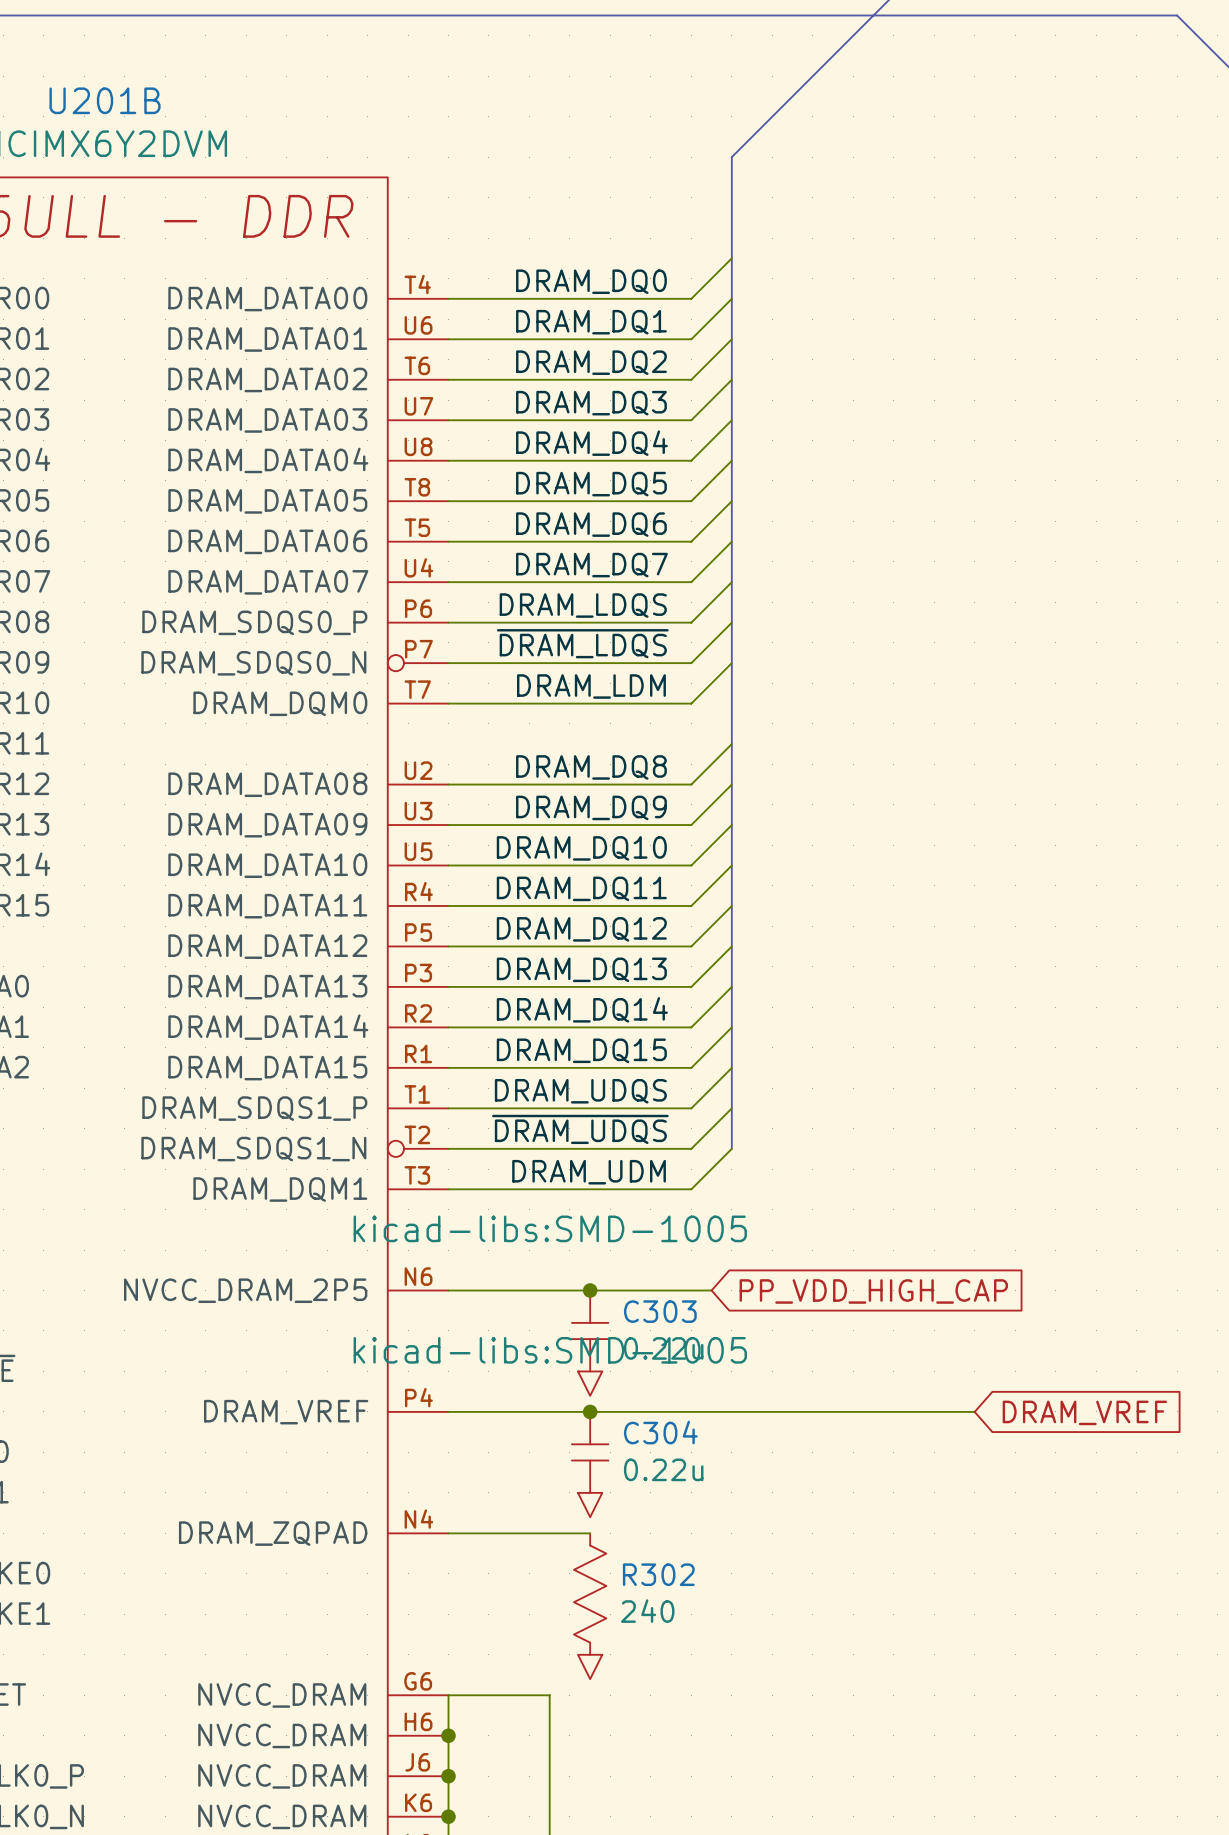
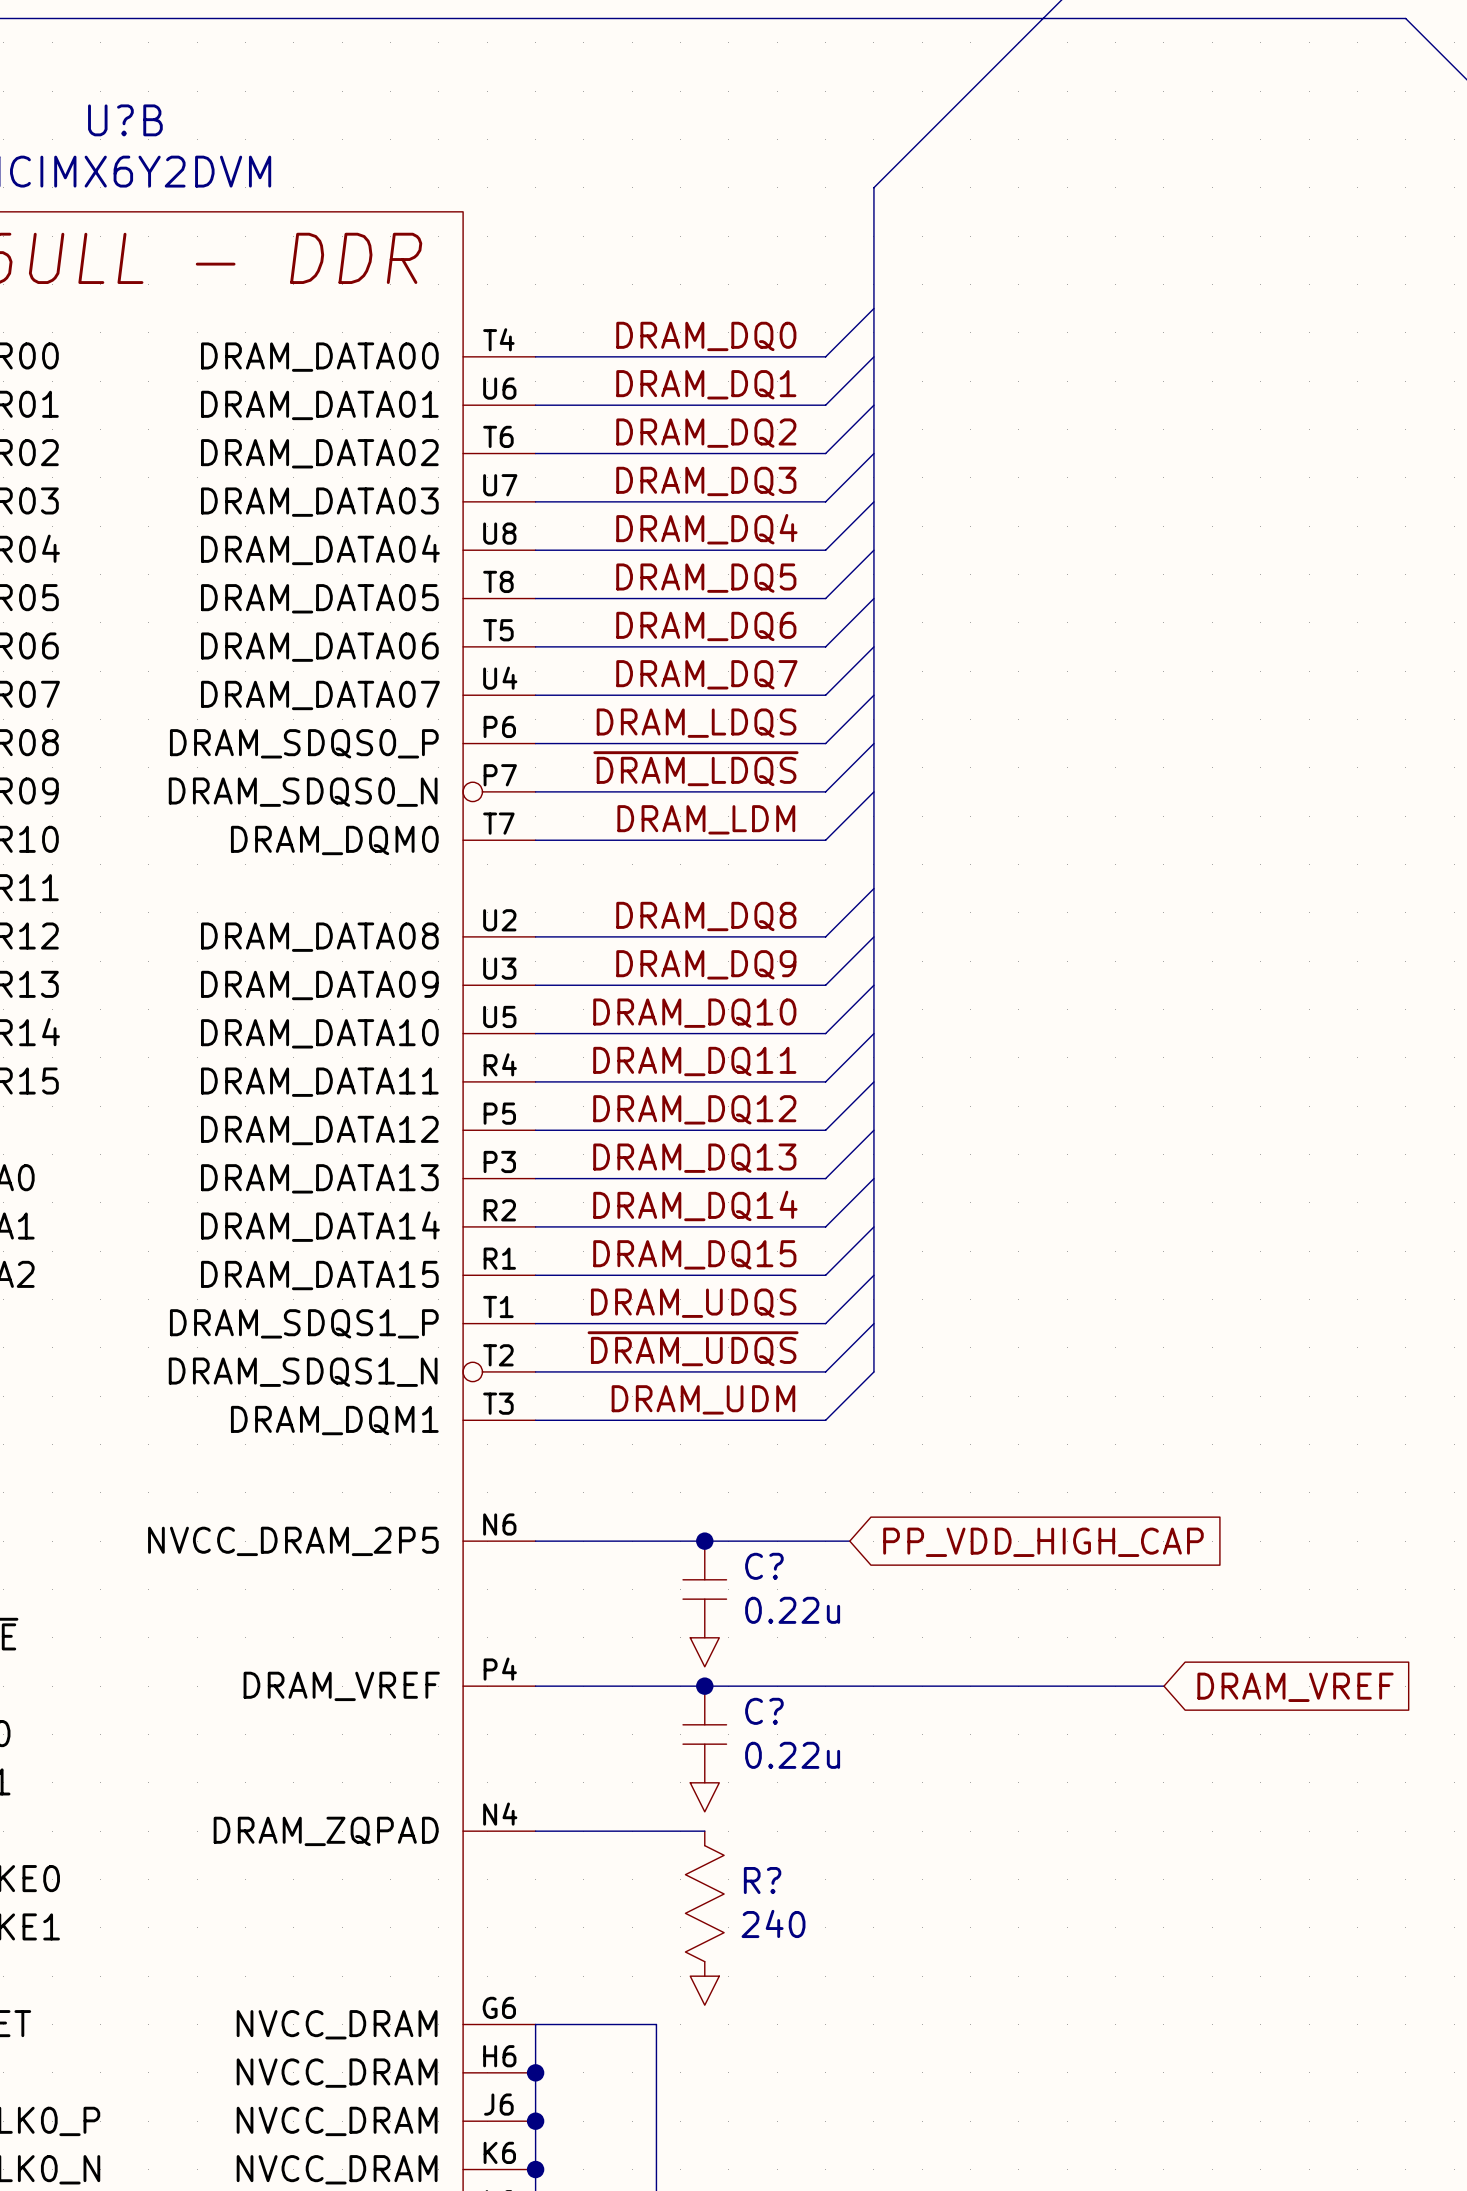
U201B name: U201B (105, 100) -> U?B (125, 120)
C303 text: kicad-libs:SMD-1005 (550, 1228) -> none
C303 name: C303 (660, 1311) -> C? (764, 1566)
C304 text: kicad-libs:SMD-1005 (550, 1350) -> none
C304 name: C304 (660, 1432) -> C? (764, 1711)
R302 name: R302 (658, 1574) -> R? (762, 1880)

